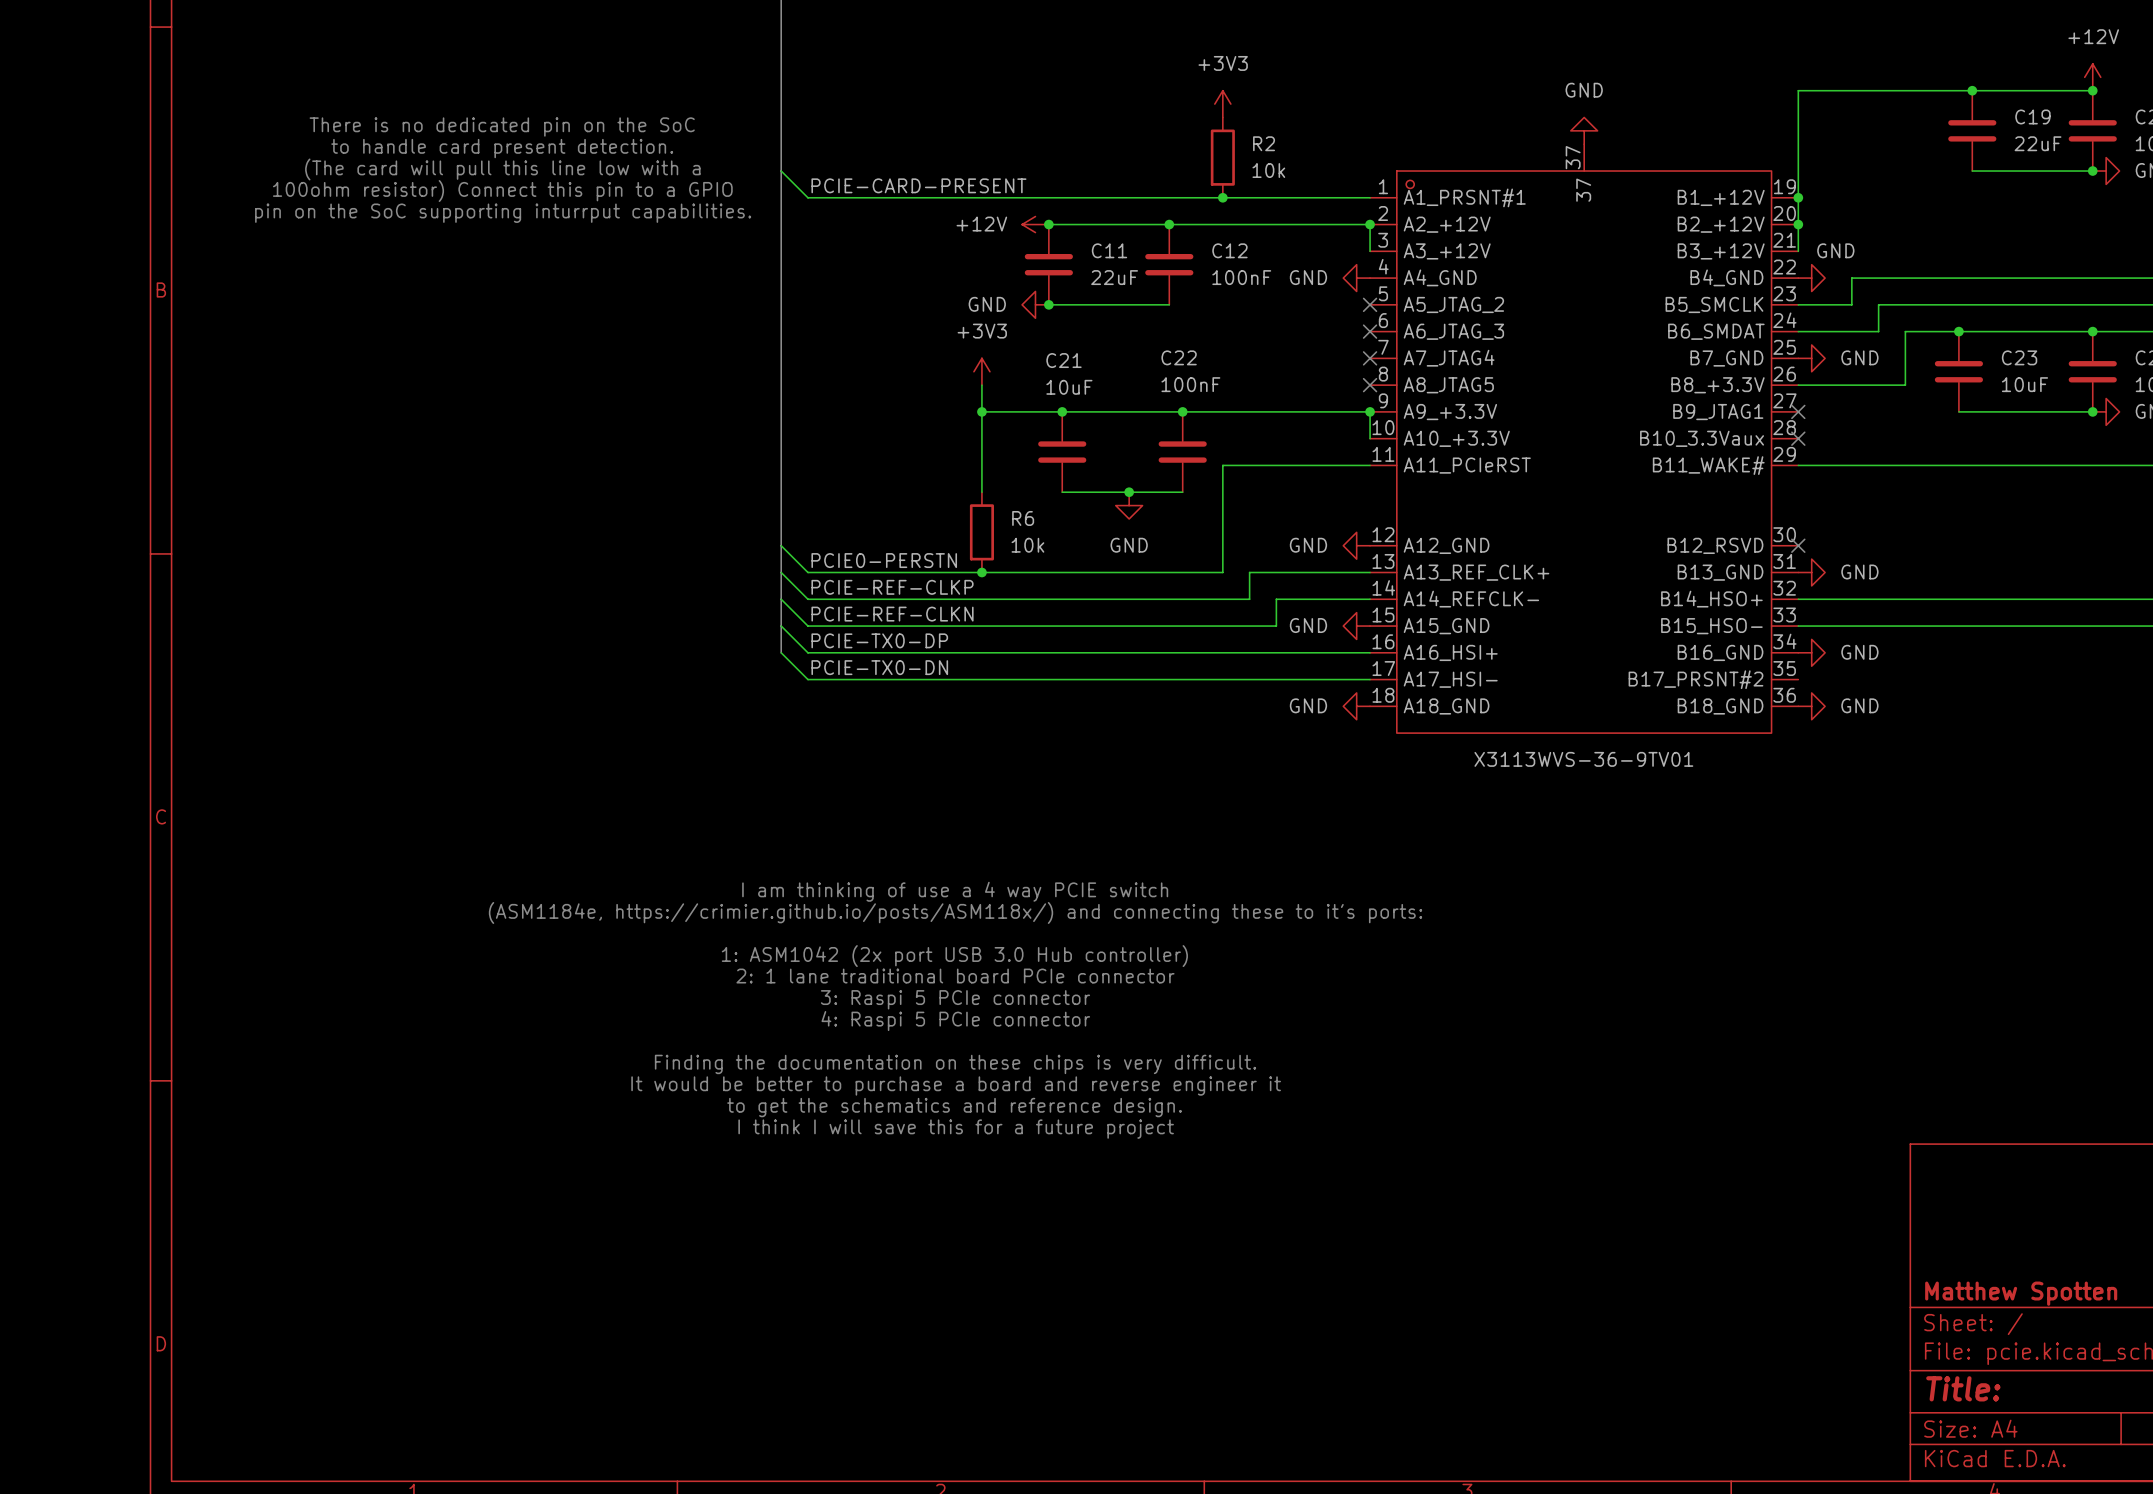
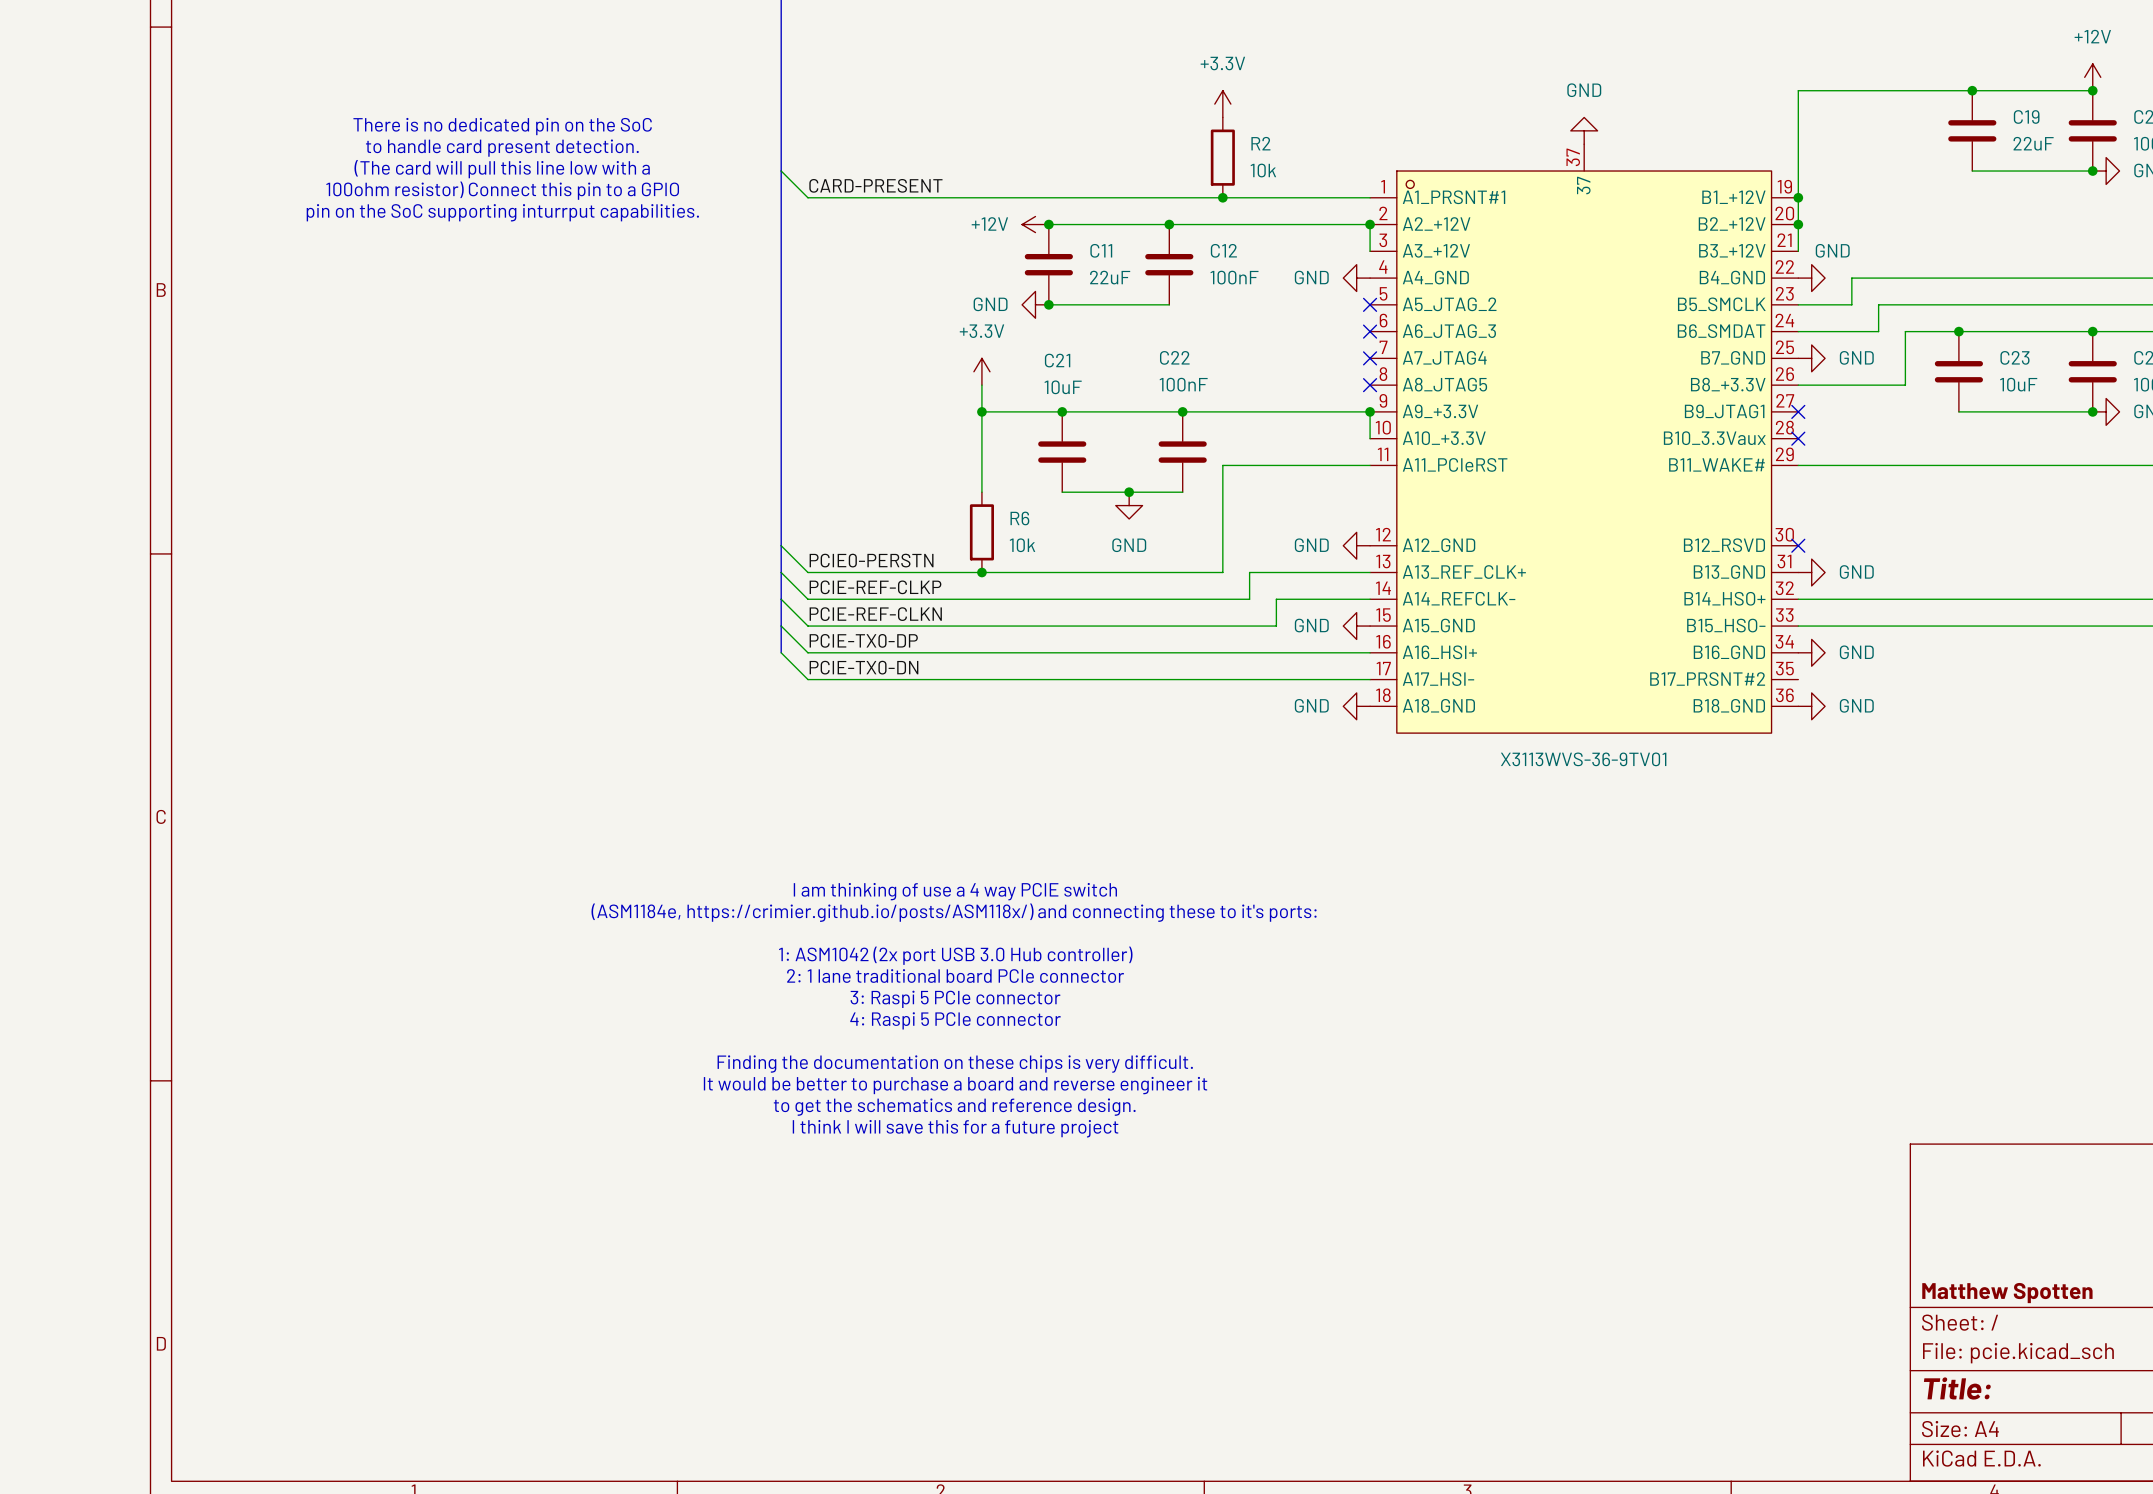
power symbol: +3V3 (1222, 104) -> +3.3V (1222, 104)
label: PCIE-CARD-PRESENT (918, 185) -> CARD-PRESENT (875, 185)
power symbol: +3V3 (981, 371) -> +3.3V (981, 371)

